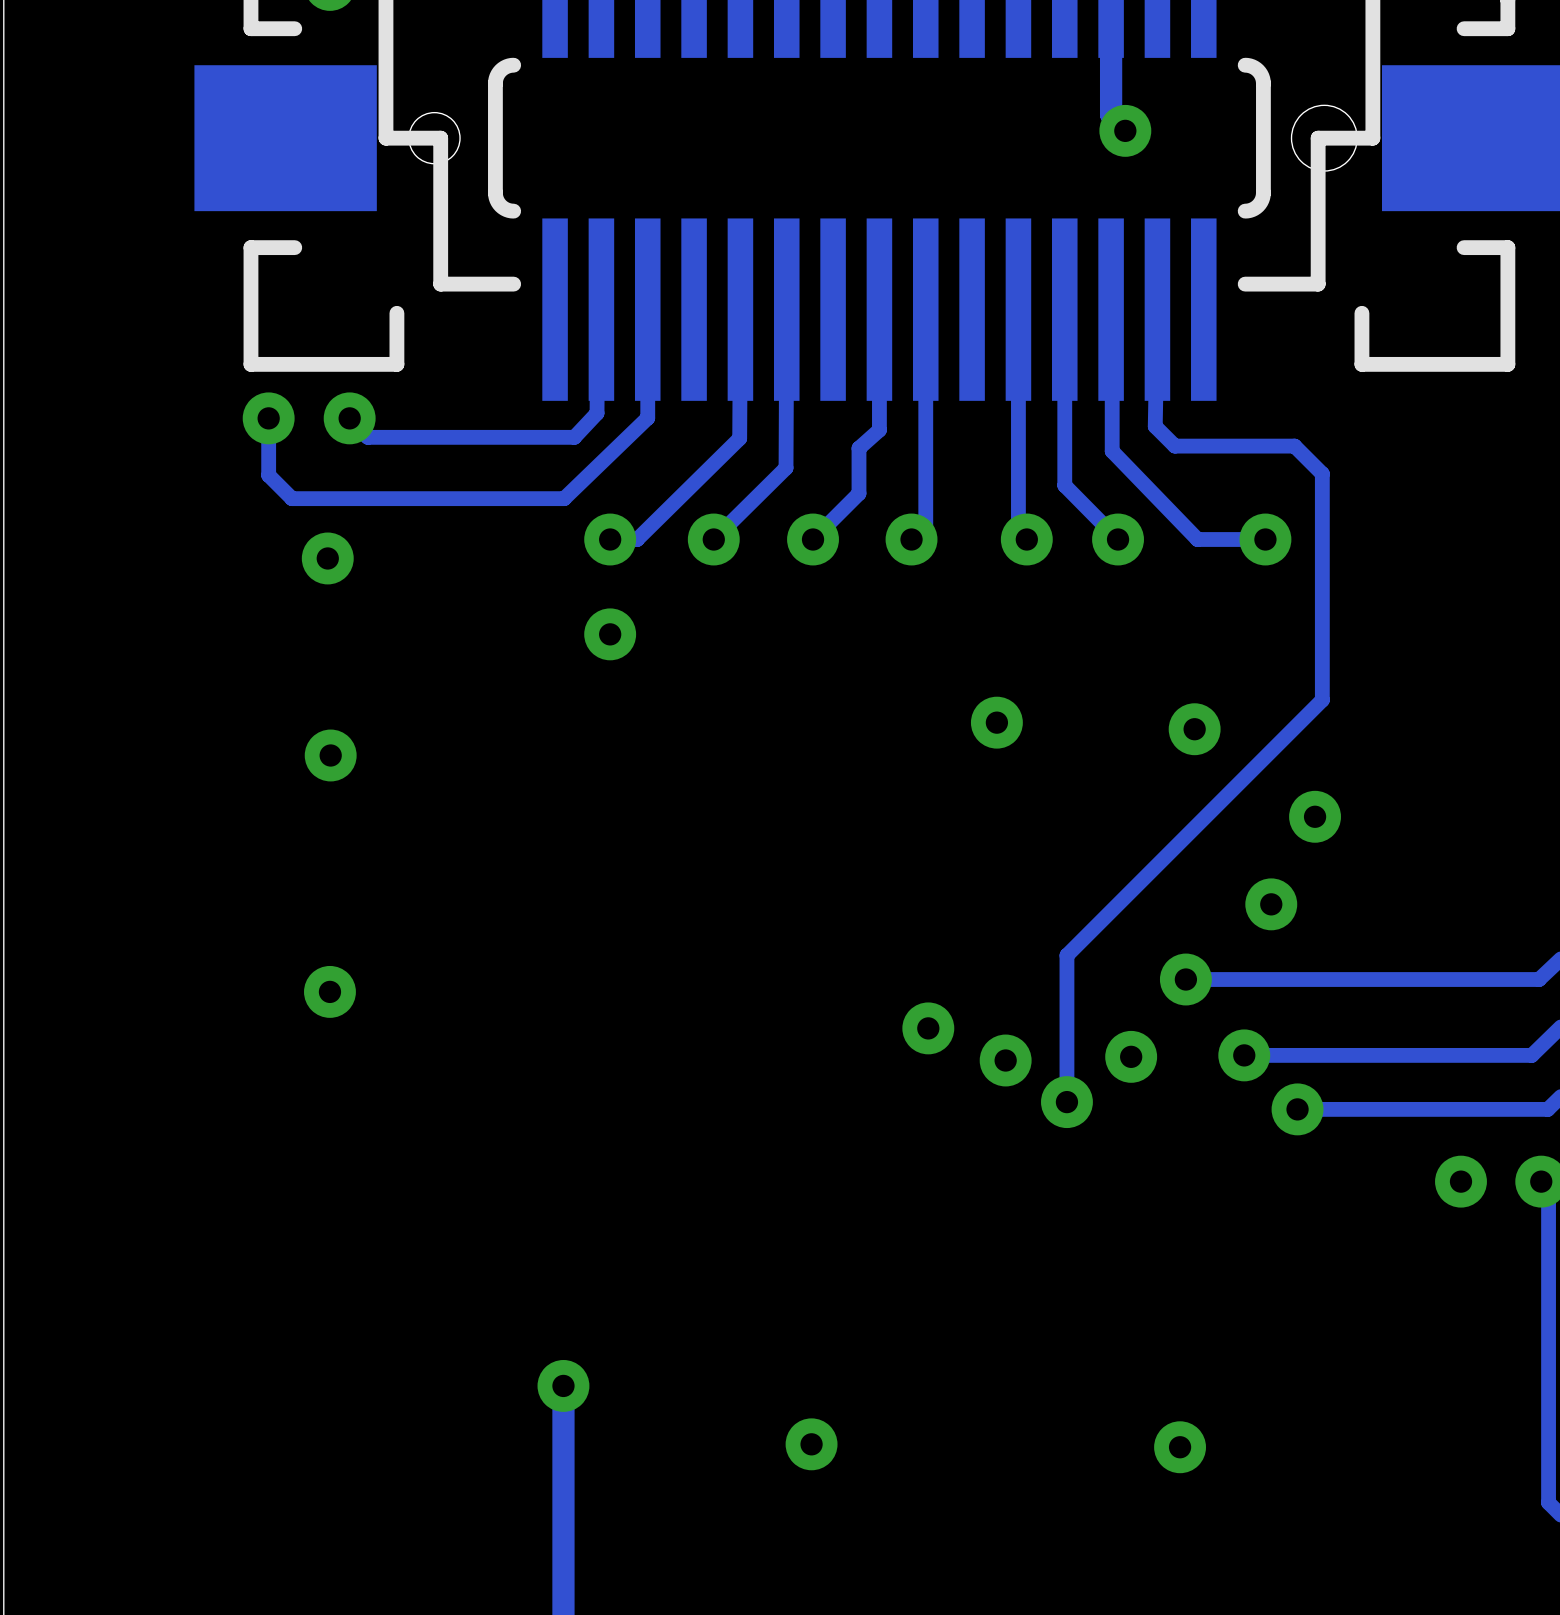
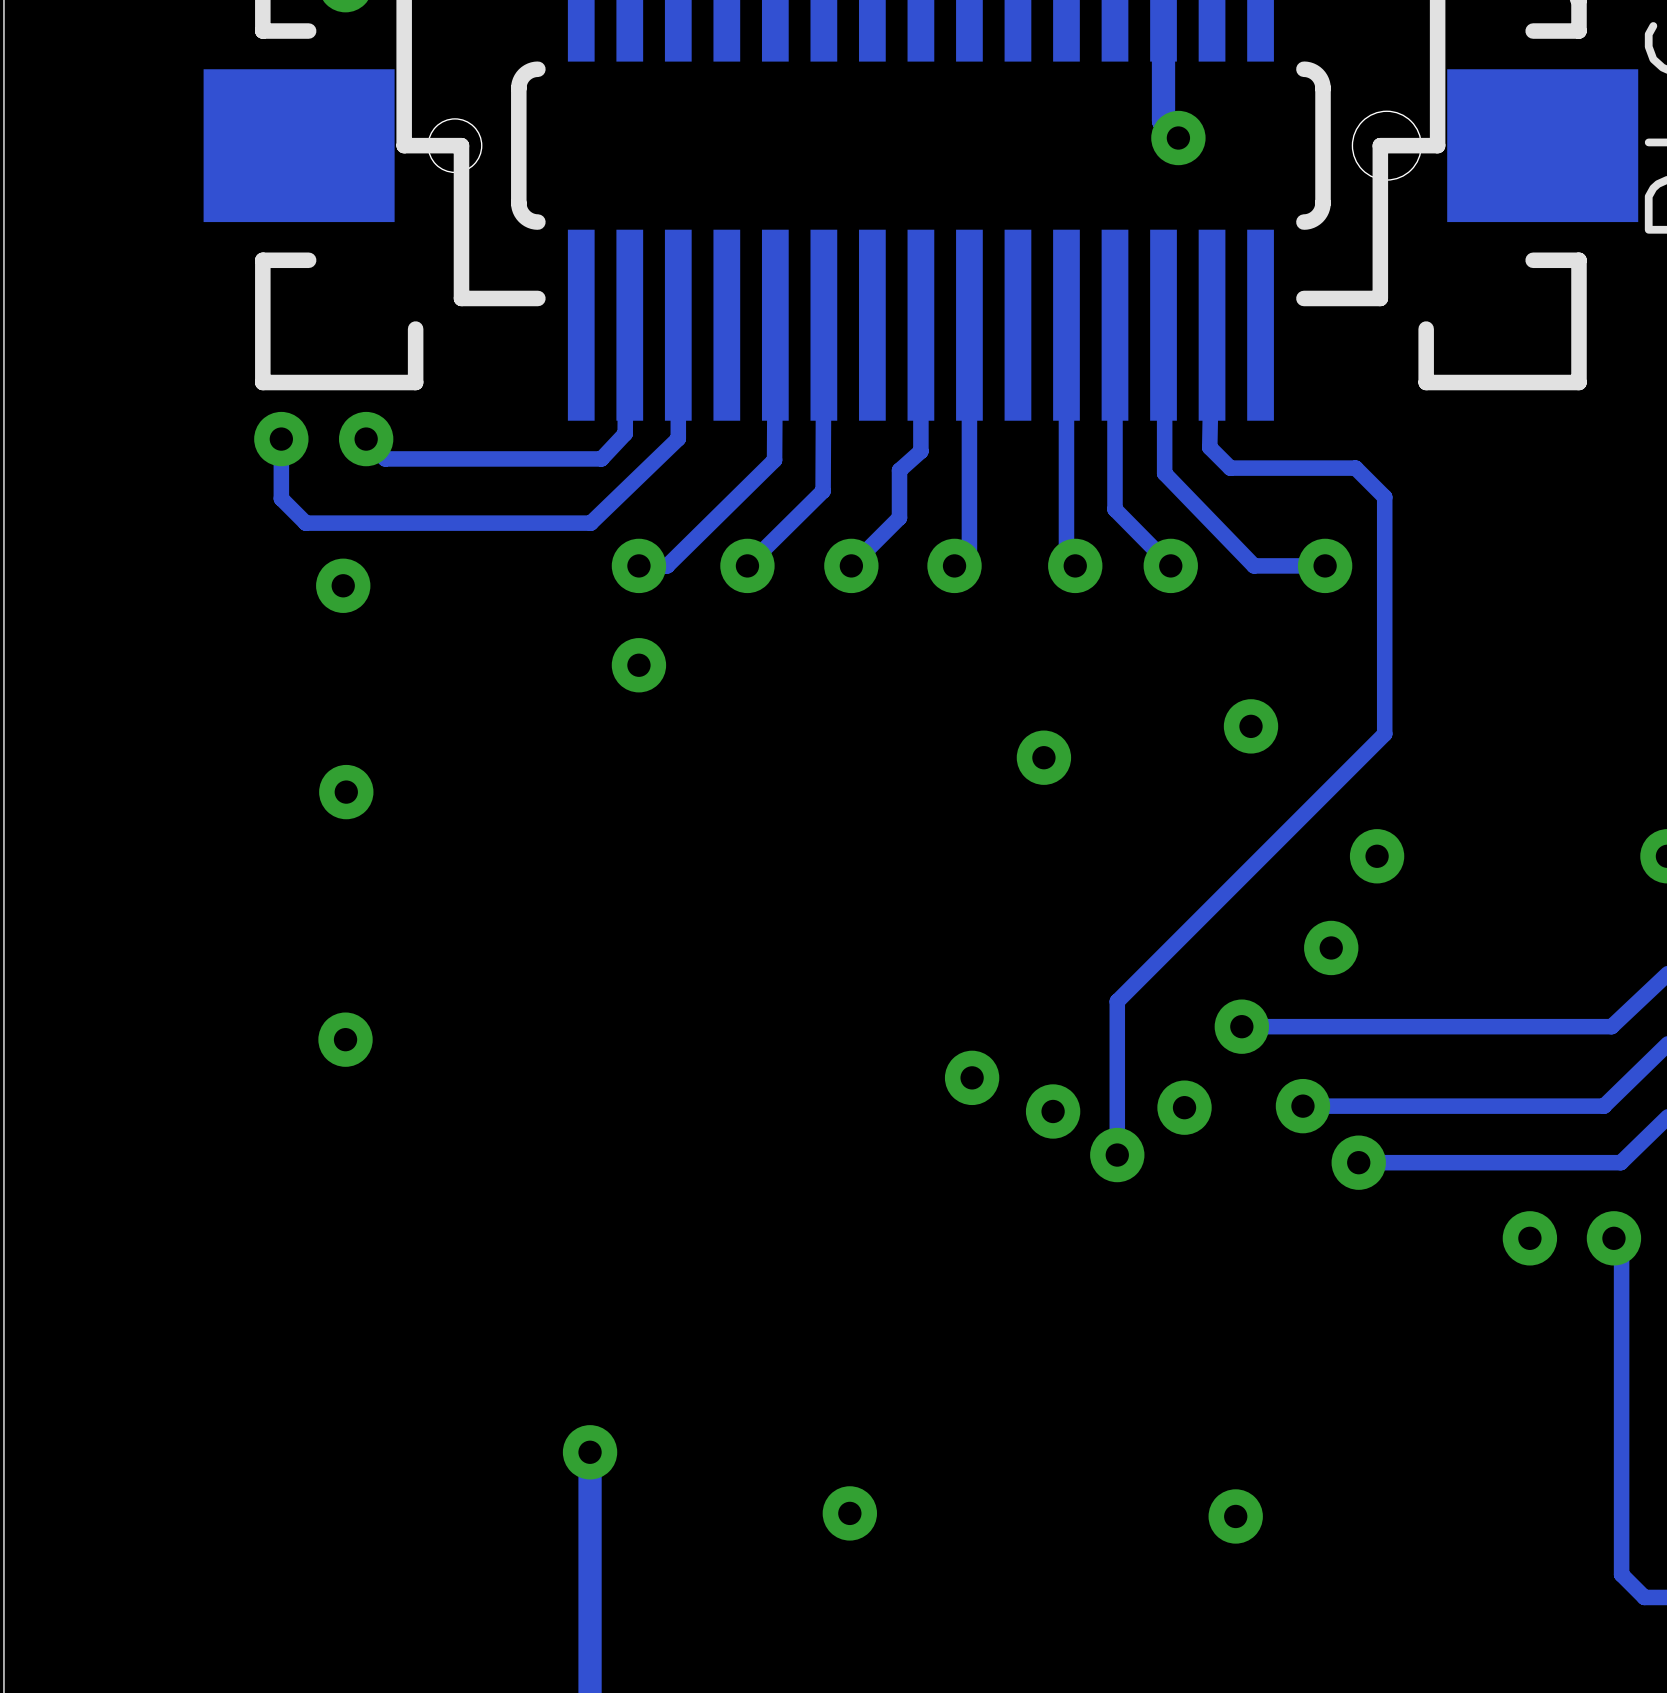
via position: (1194, 729) -> (1251, 726)

